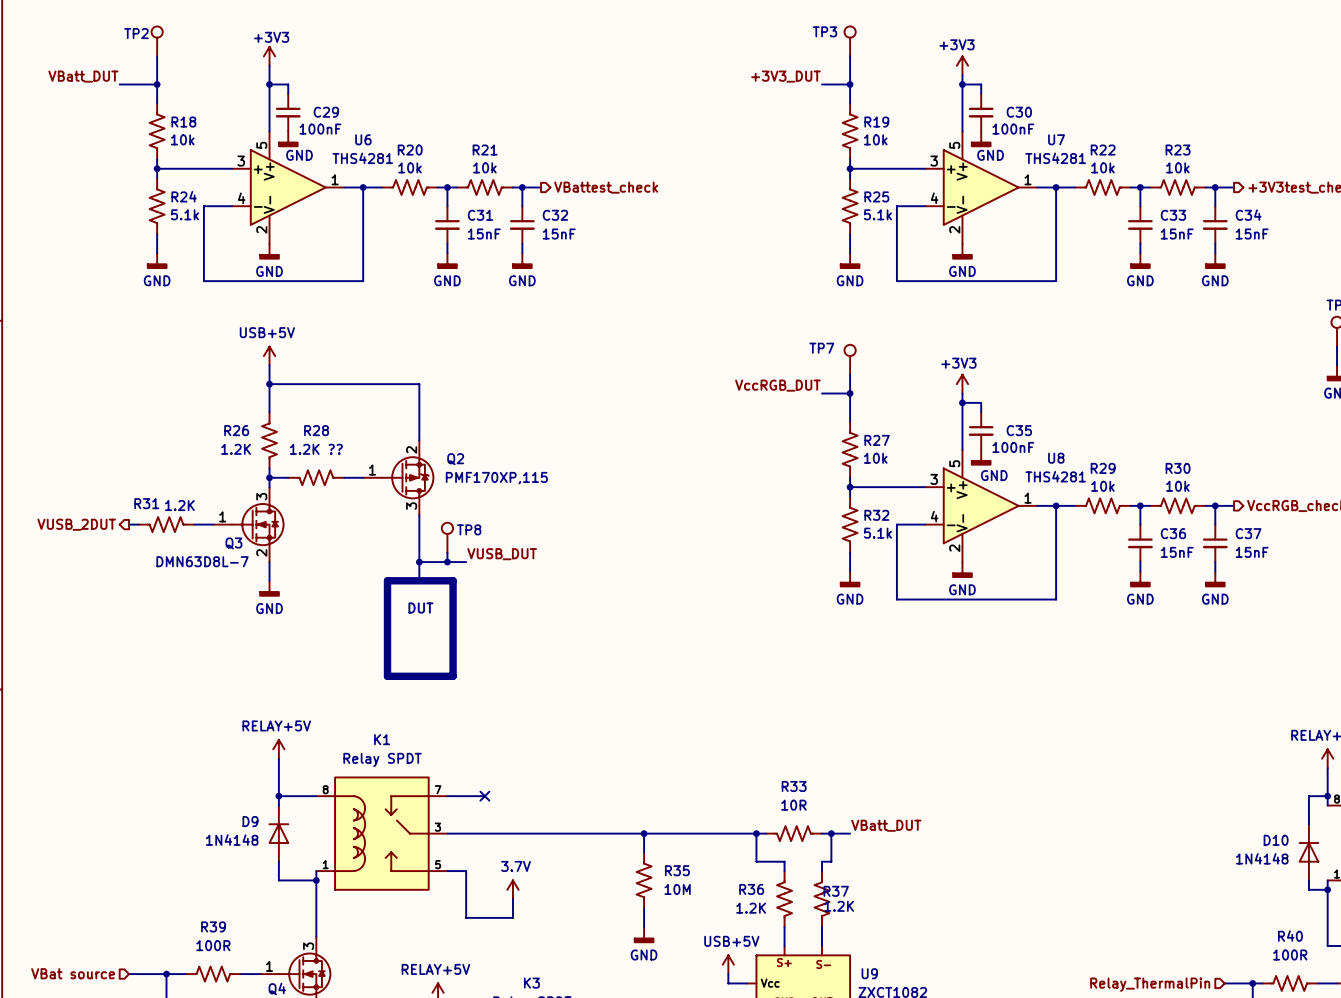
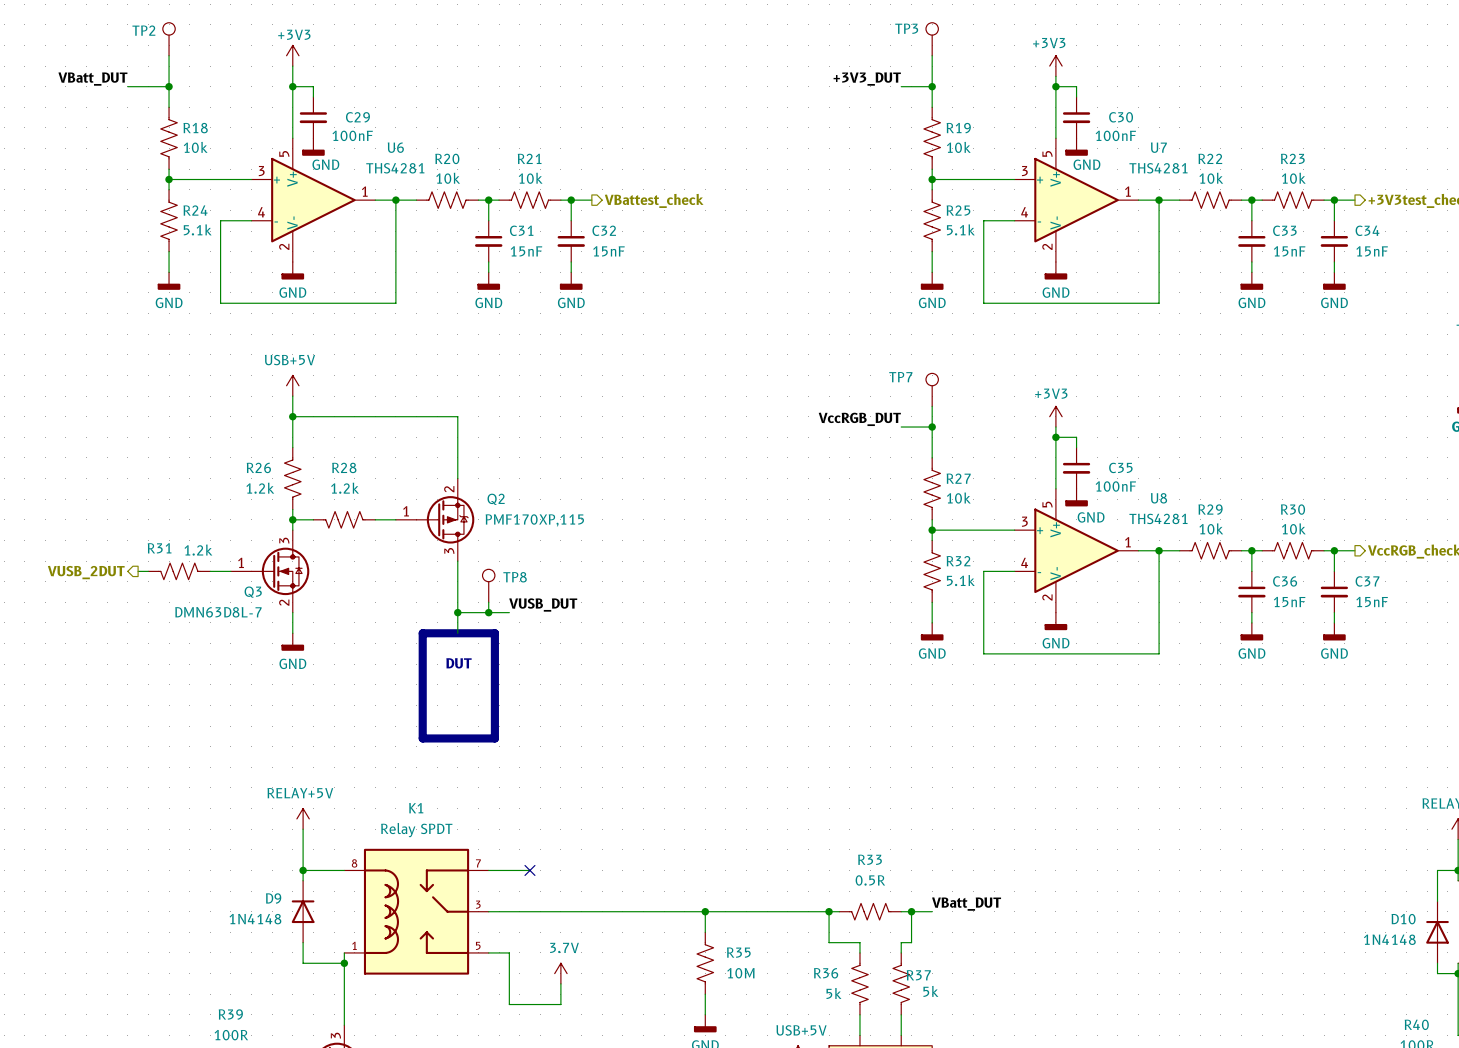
R26 value: 1.2K (236, 449) -> 1.2k (260, 488)
R28 value: 1.2K ?? (316, 449) -> 1.2k (345, 488)
R31 value: 1.2K (179, 505) -> 1.2k (198, 550)
R33 value: 10R (793, 805) -> 0.5R (870, 880)
R37 value: 1.2K (839, 906) -> 5k (930, 991)
R36 value: 1.2K (751, 908) -> 5k (833, 993)

